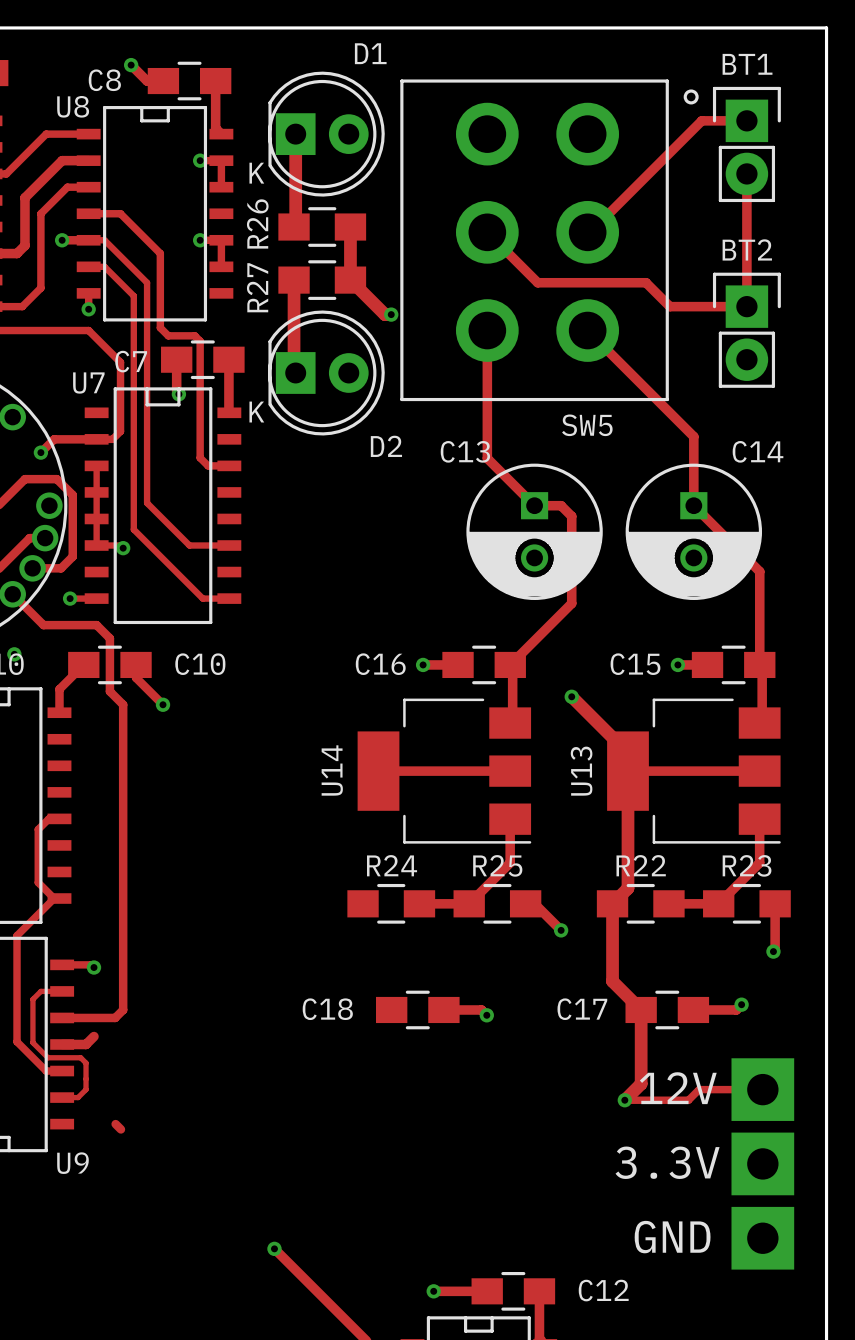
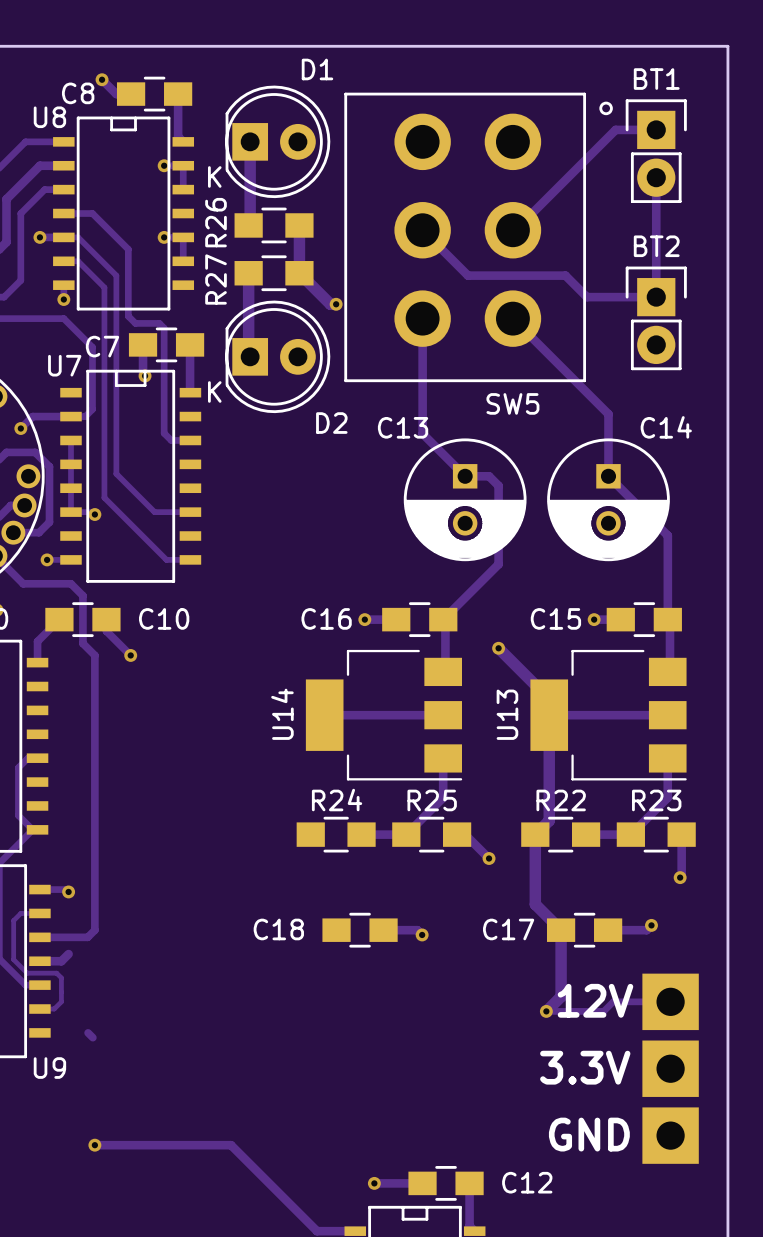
track: none -> (94, 1145) (231, 1145)
via: none -> (94, 1145)
via: (274, 1248) -> none

